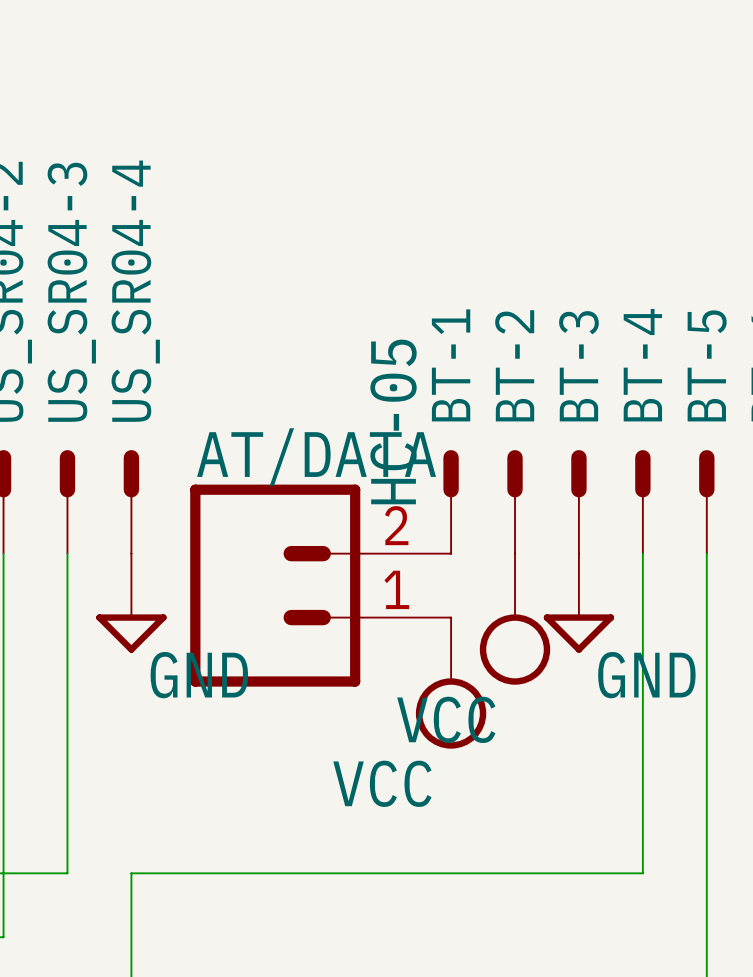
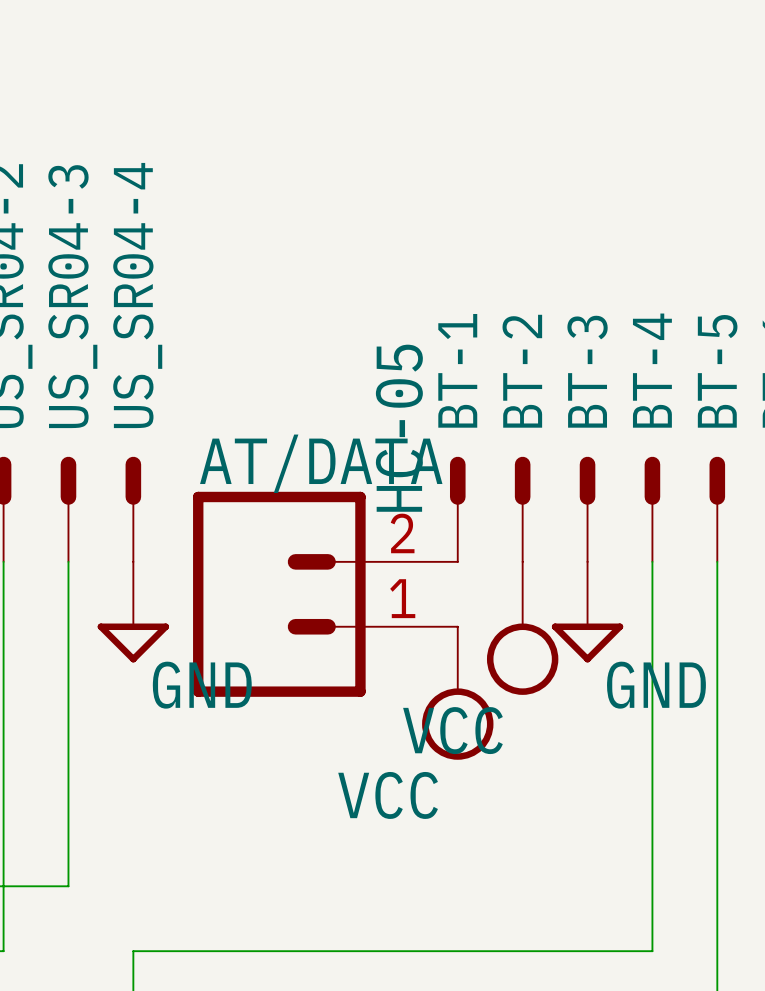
wire: (642, 873) (131, 873) (131, 937) -> (652, 886) (652, 951) (133, 951)

